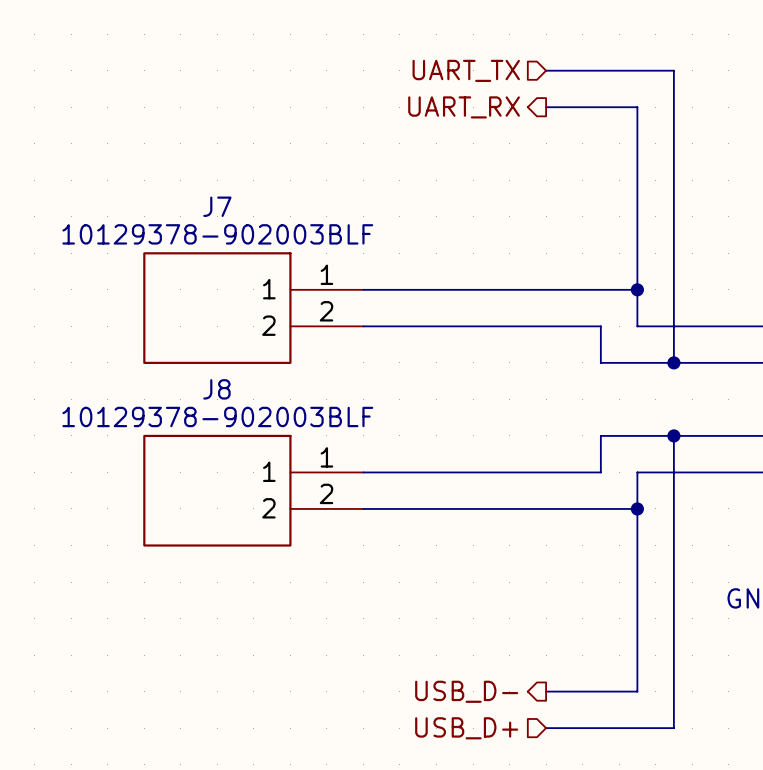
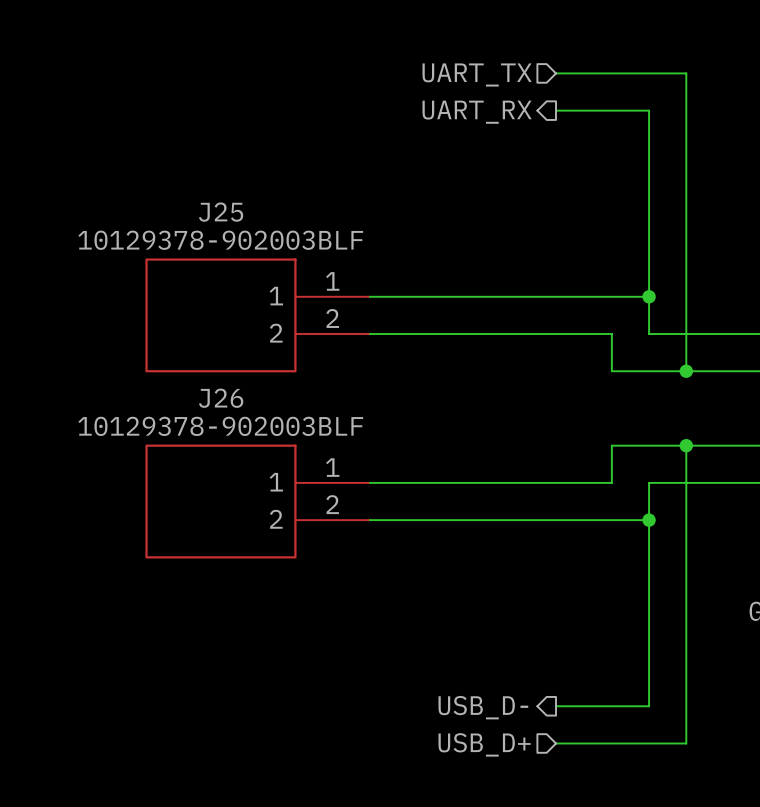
J7 name: J7 (217, 206) -> J25 (221, 212)
J8 name: J8 (216, 389) -> J26 (221, 398)

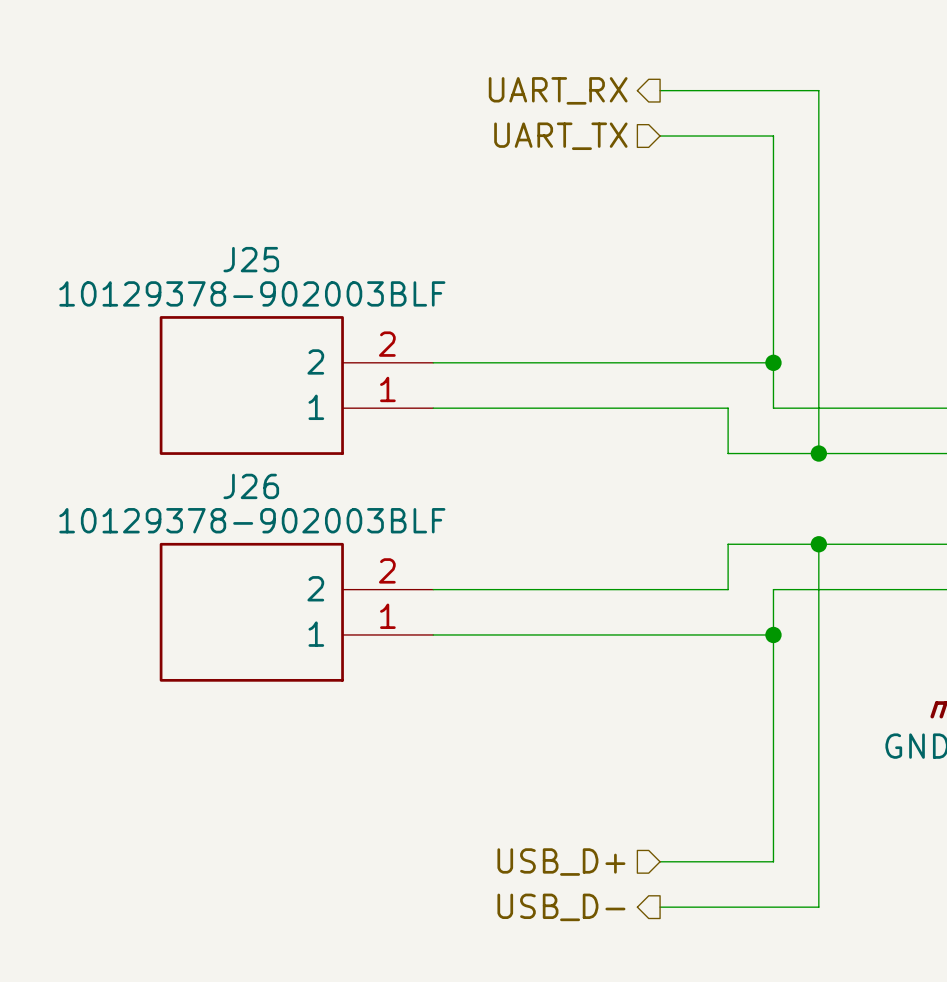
hierarchical label shape: input (477, 74) -> output (558, 90)
hierarchical label: UART_TX (477, 74) -> UART_RX (558, 90)
hierarchical label shape: output (477, 112) -> input (560, 136)
hierarchical label: UART_RX (477, 112) -> UART_TX (560, 136)
J25 flip: as is (220, 315) -> up-down (251, 385)
J26 flip: as is (220, 501) -> up-down (251, 612)
hierarchical label shape: output (483, 707) -> input (561, 862)
hierarchical label: USB_D- (483, 707) -> USB_D+ (561, 862)
hierarchical label shape: input (484, 744) -> output (561, 907)
hierarchical label: USB_D+ (484, 744) -> USB_D- (561, 907)

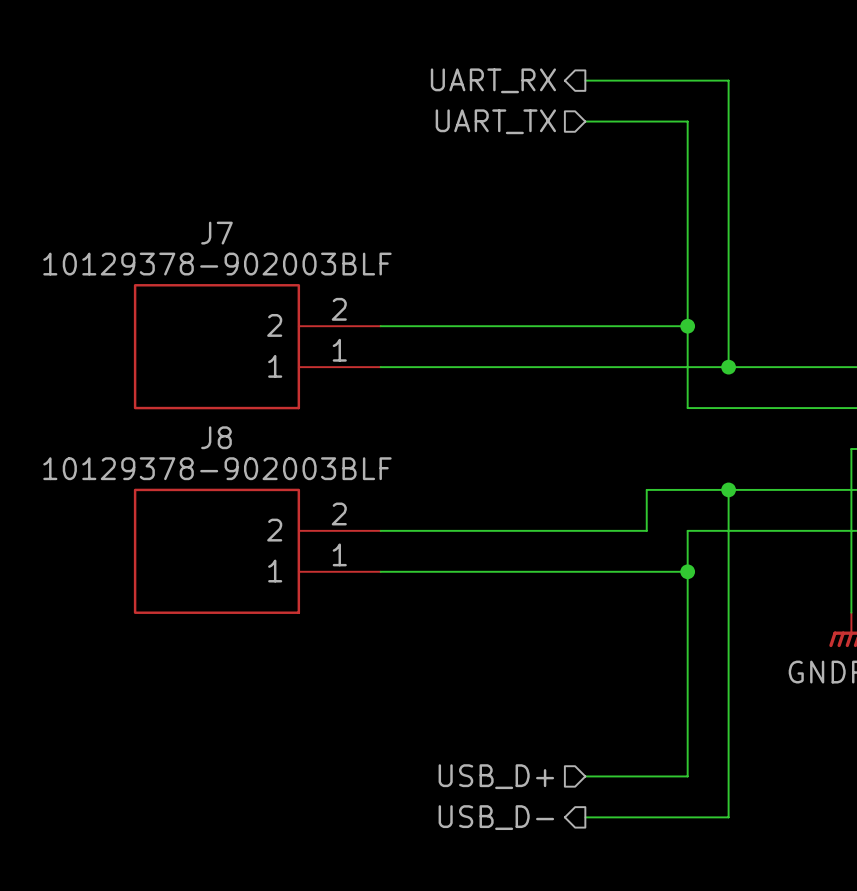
J25 name: J25 (251, 259) -> J7 (216, 233)
wire: (728, 408) (728, 453) (773, 453) -> (646, 367) (687, 367) (687, 408)
wire: (818, 408) (818, 453) -> none
junction position: (818, 453) -> (728, 367)
J26 name: J26 (251, 486) -> J8 (216, 437)

